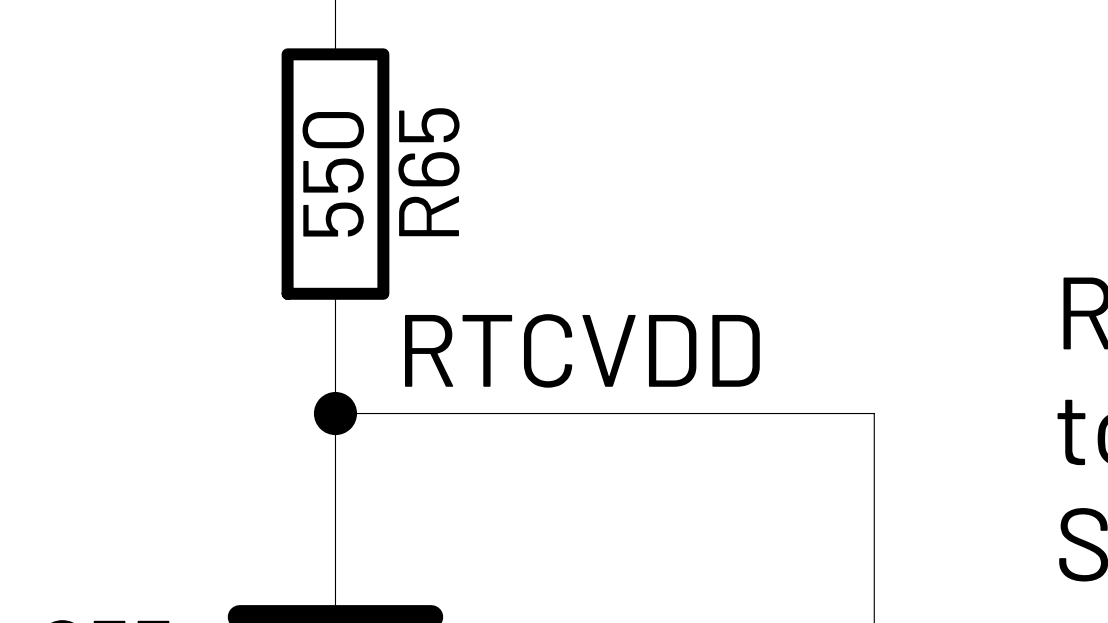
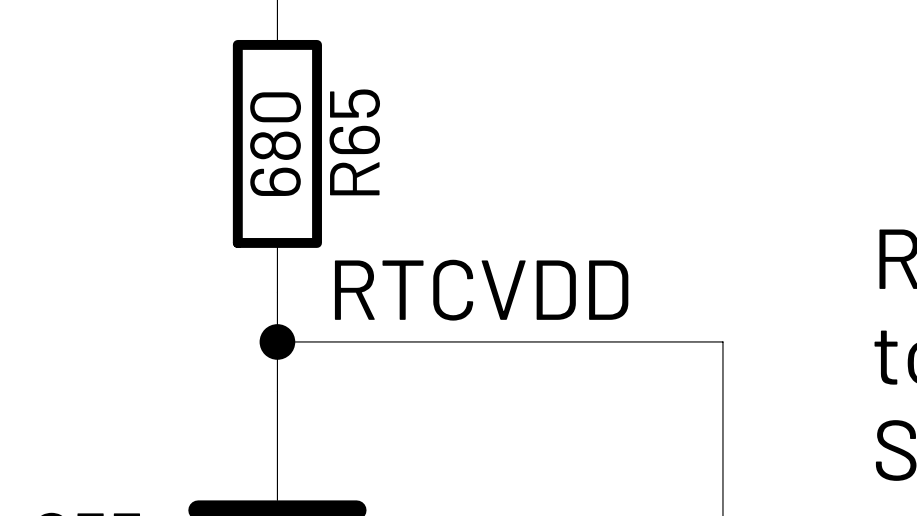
R65 value: 550 (333, 174) -> 680 (275, 144)

